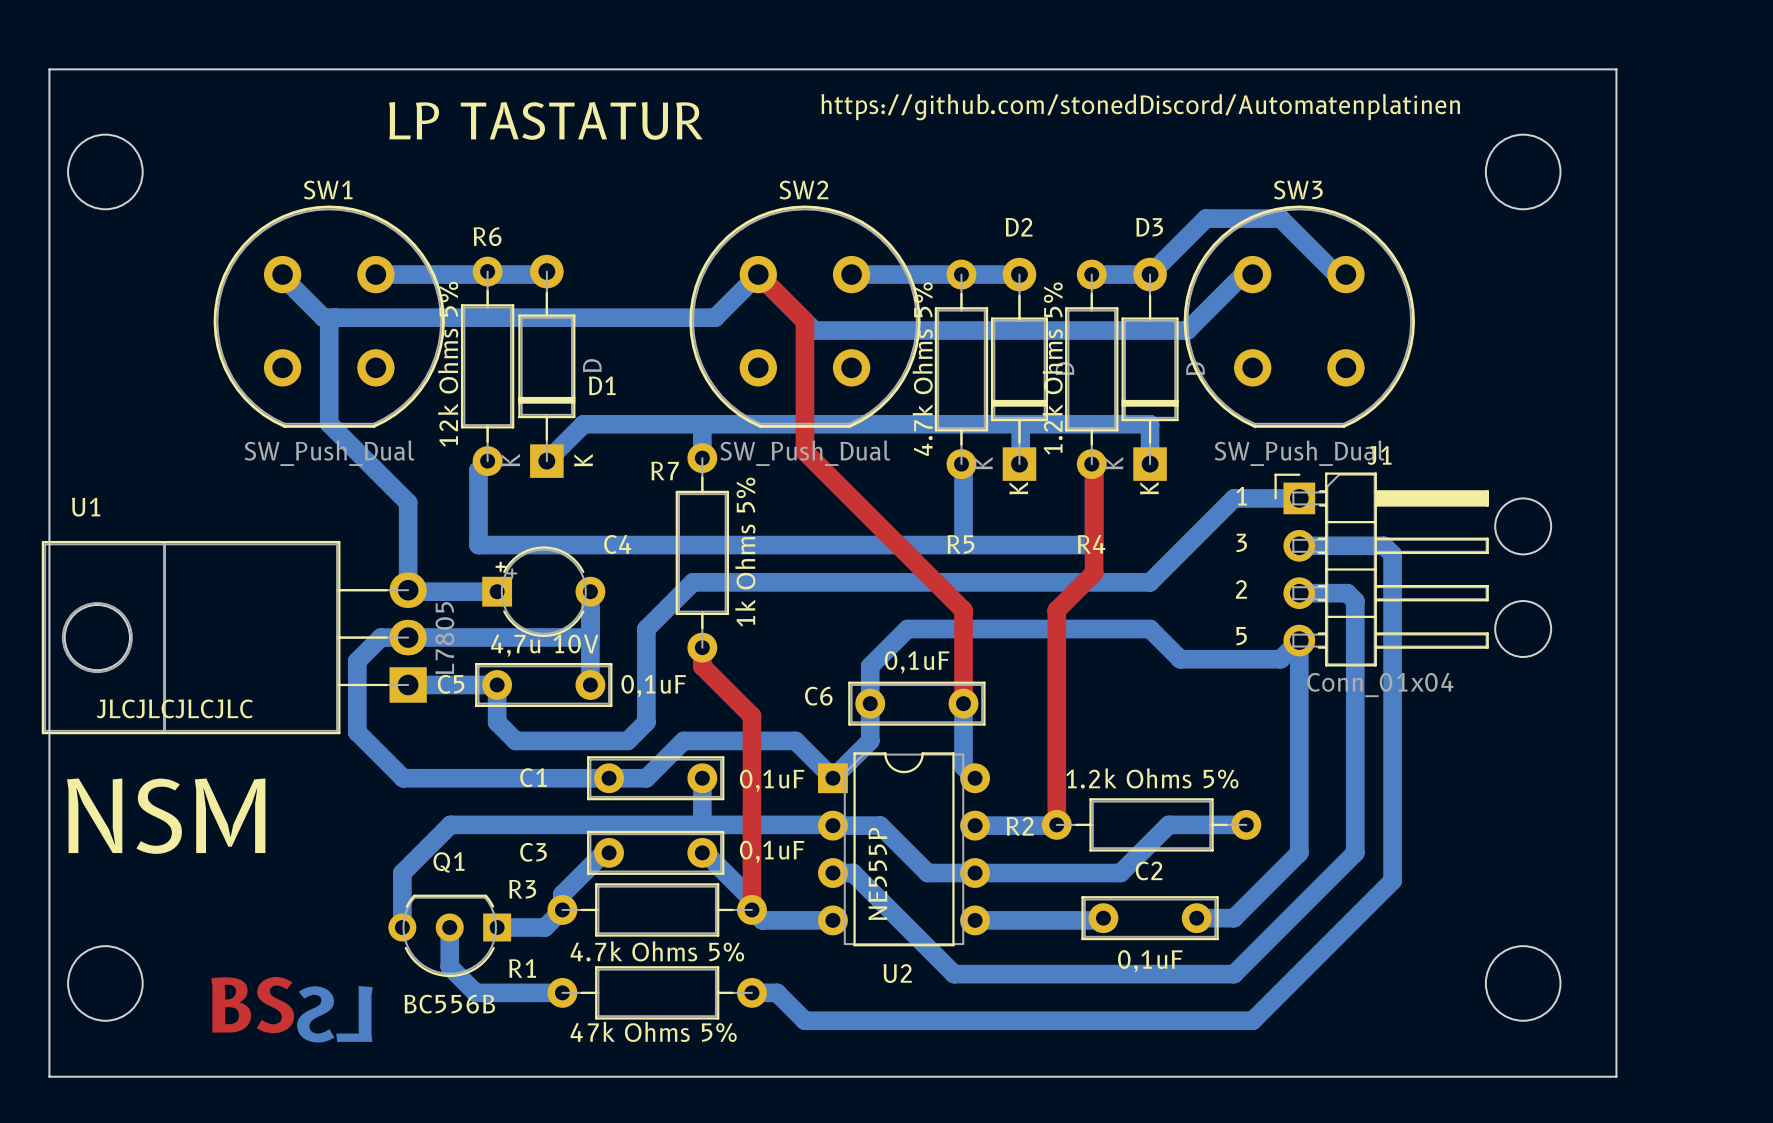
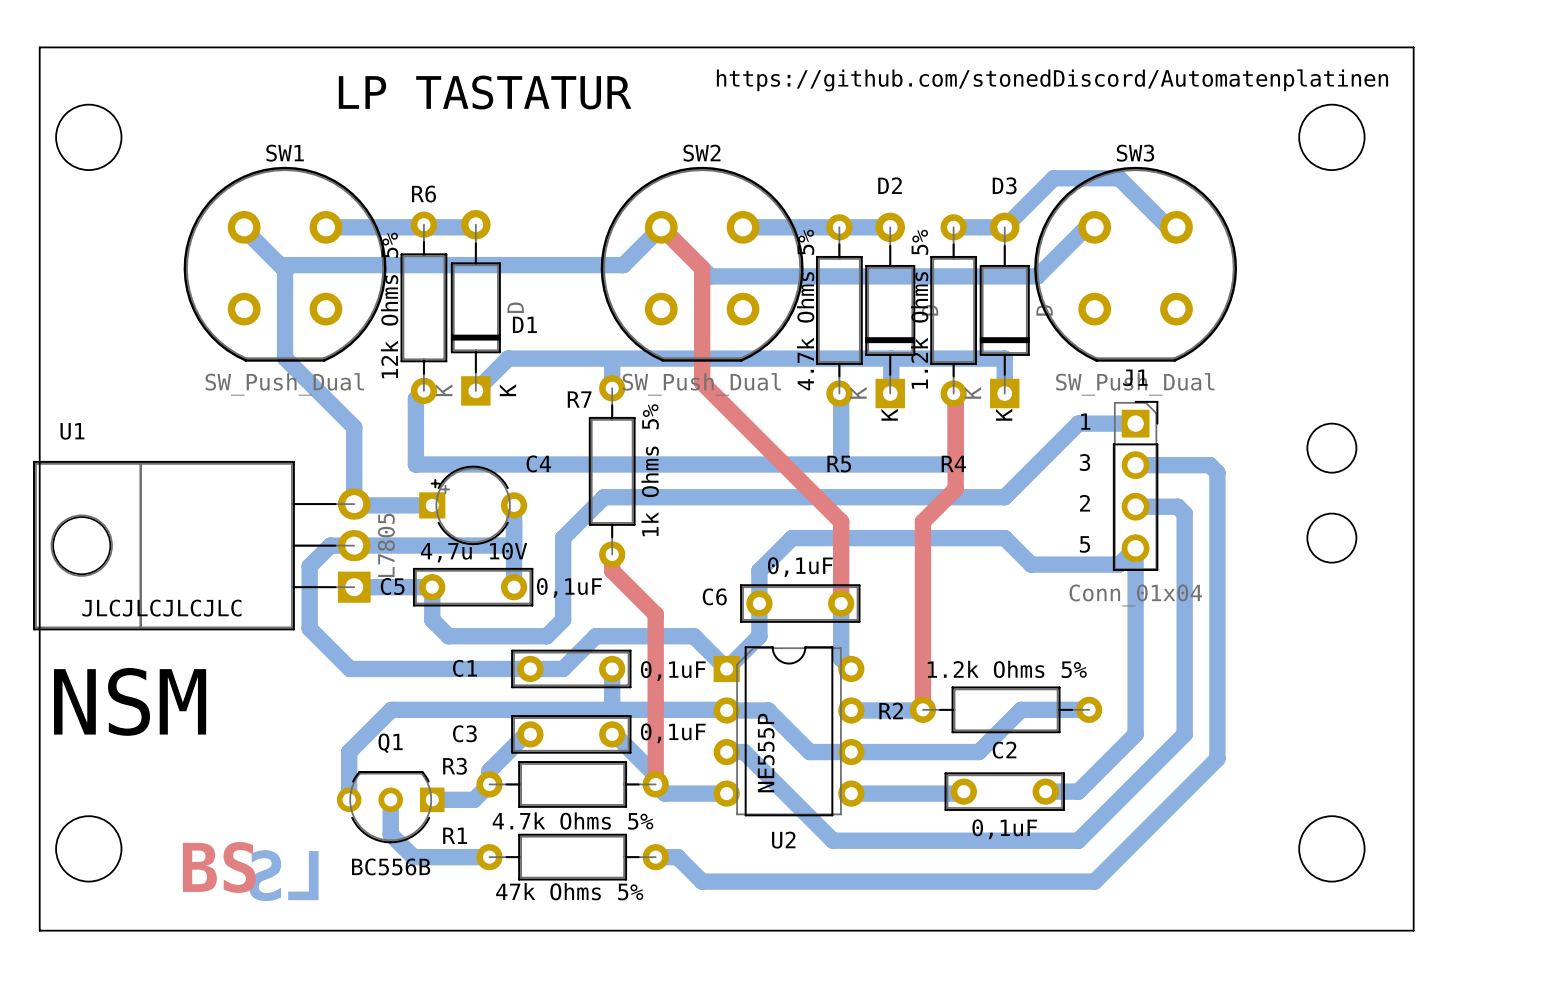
J1 footprint: [1274, 472, 1489, 667] -> [1112, 400, 1159, 571]

